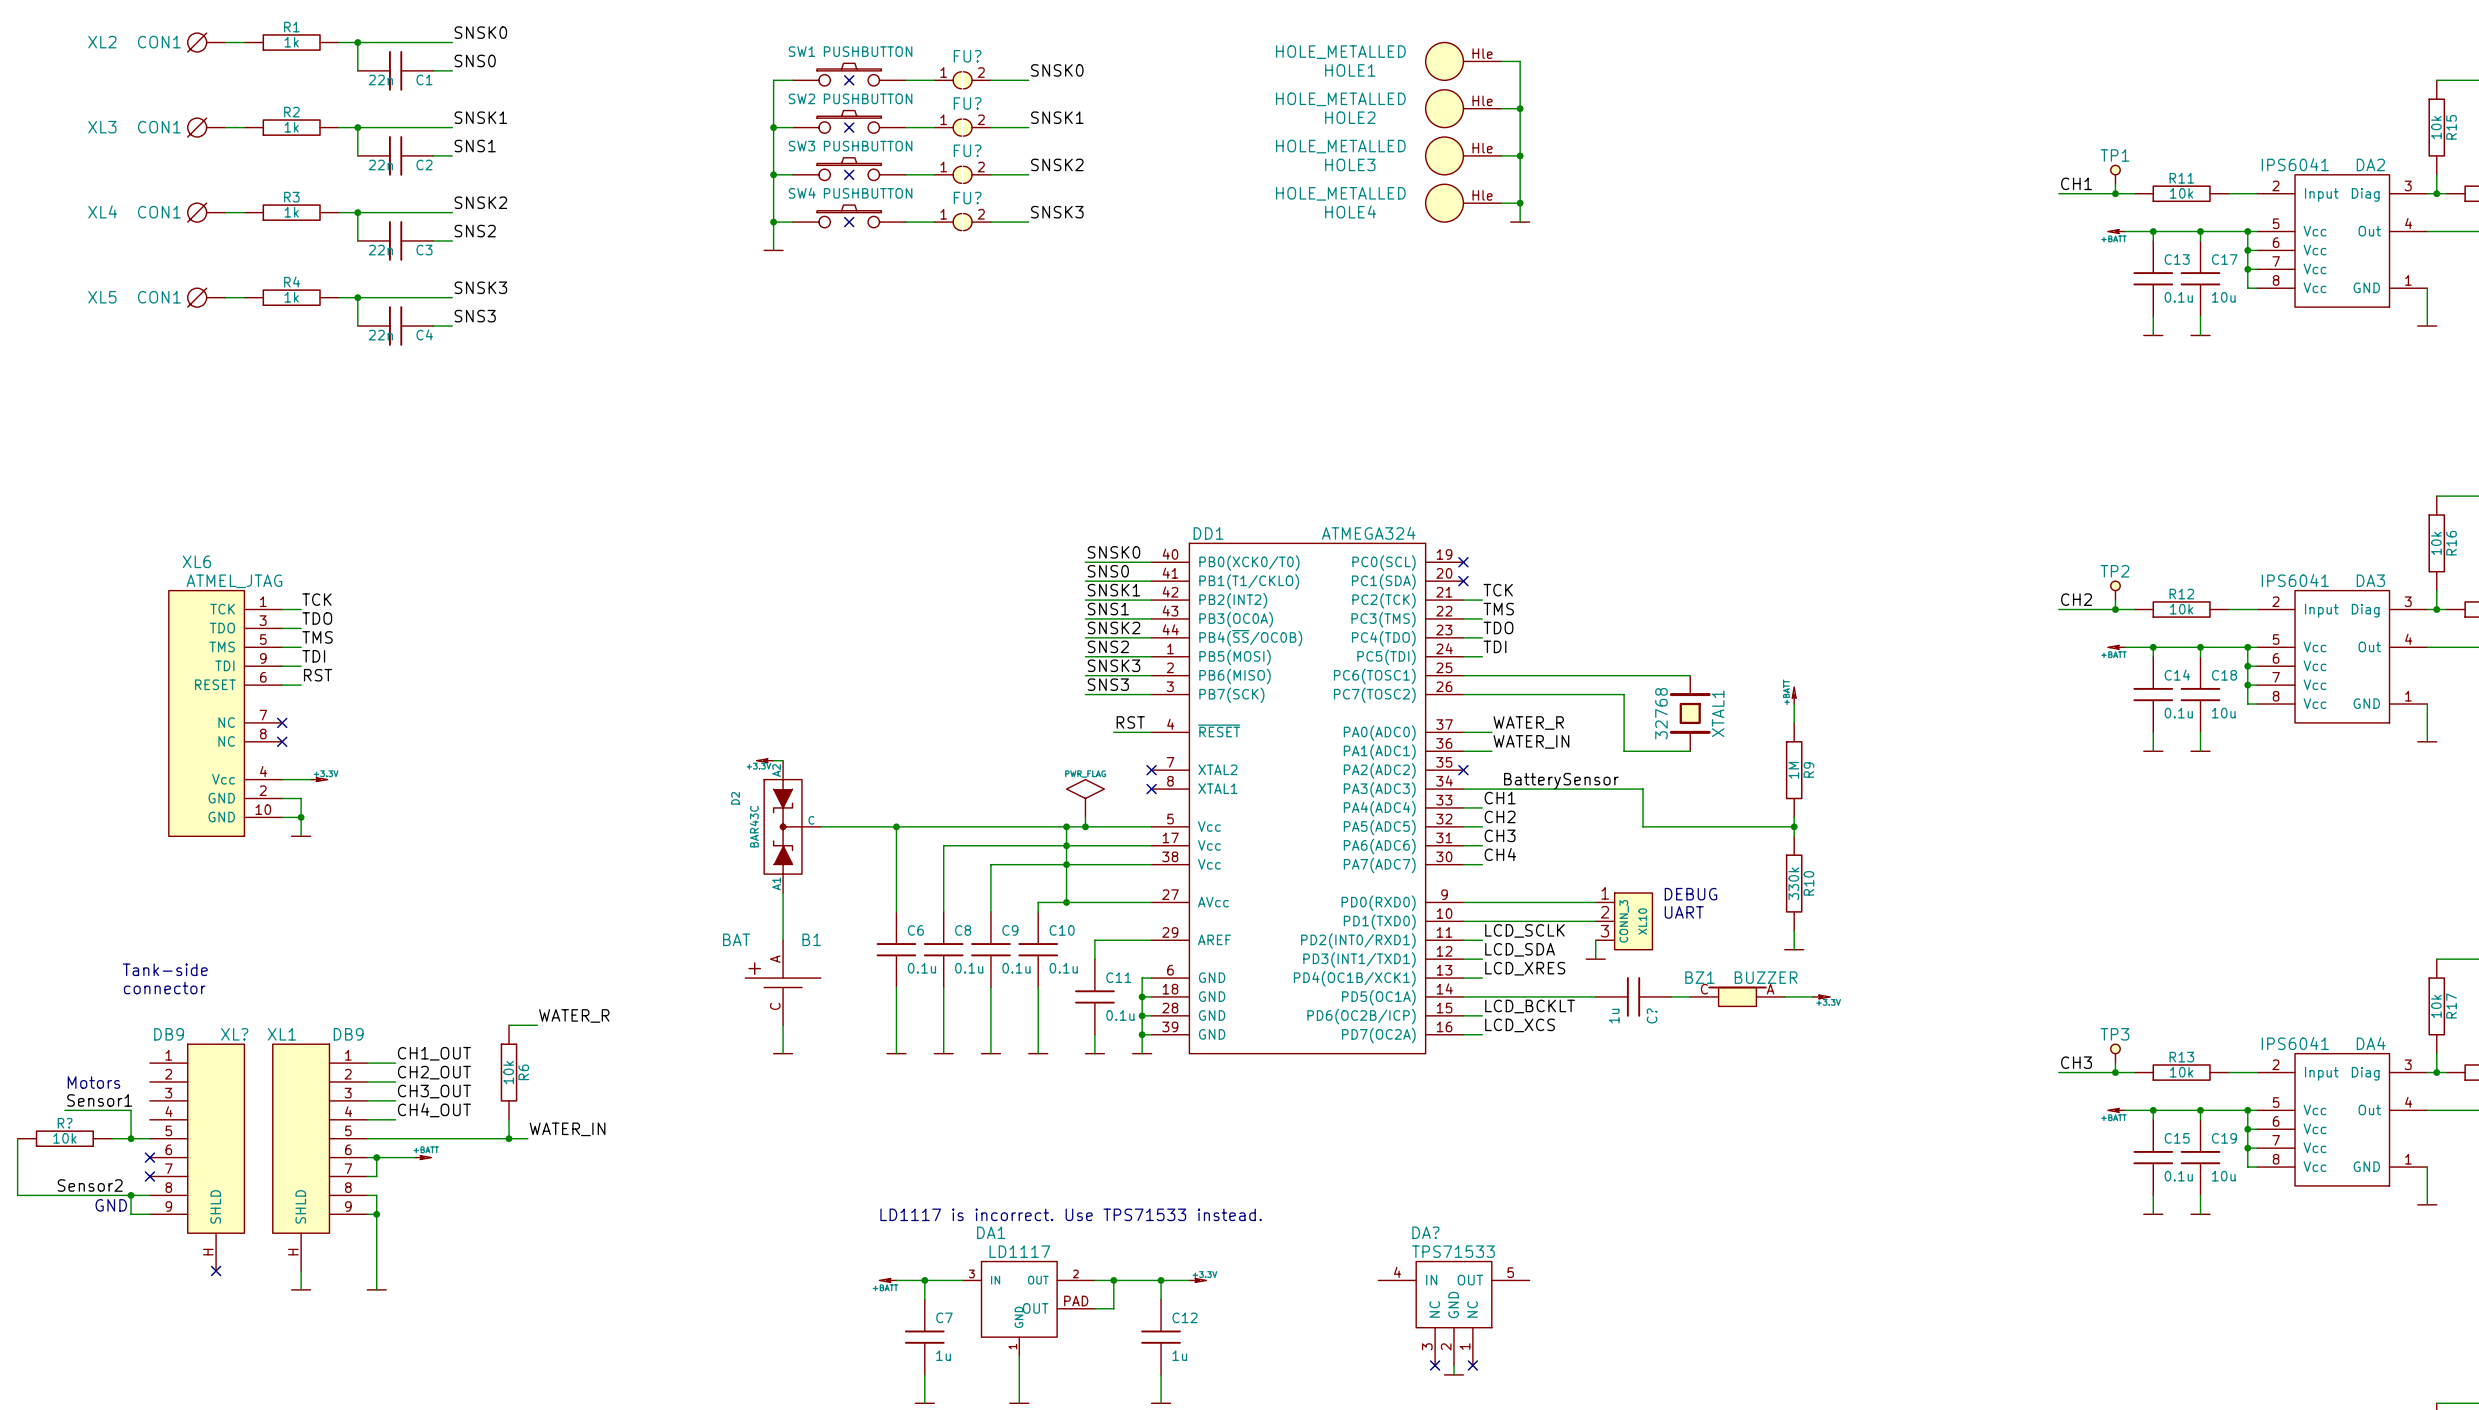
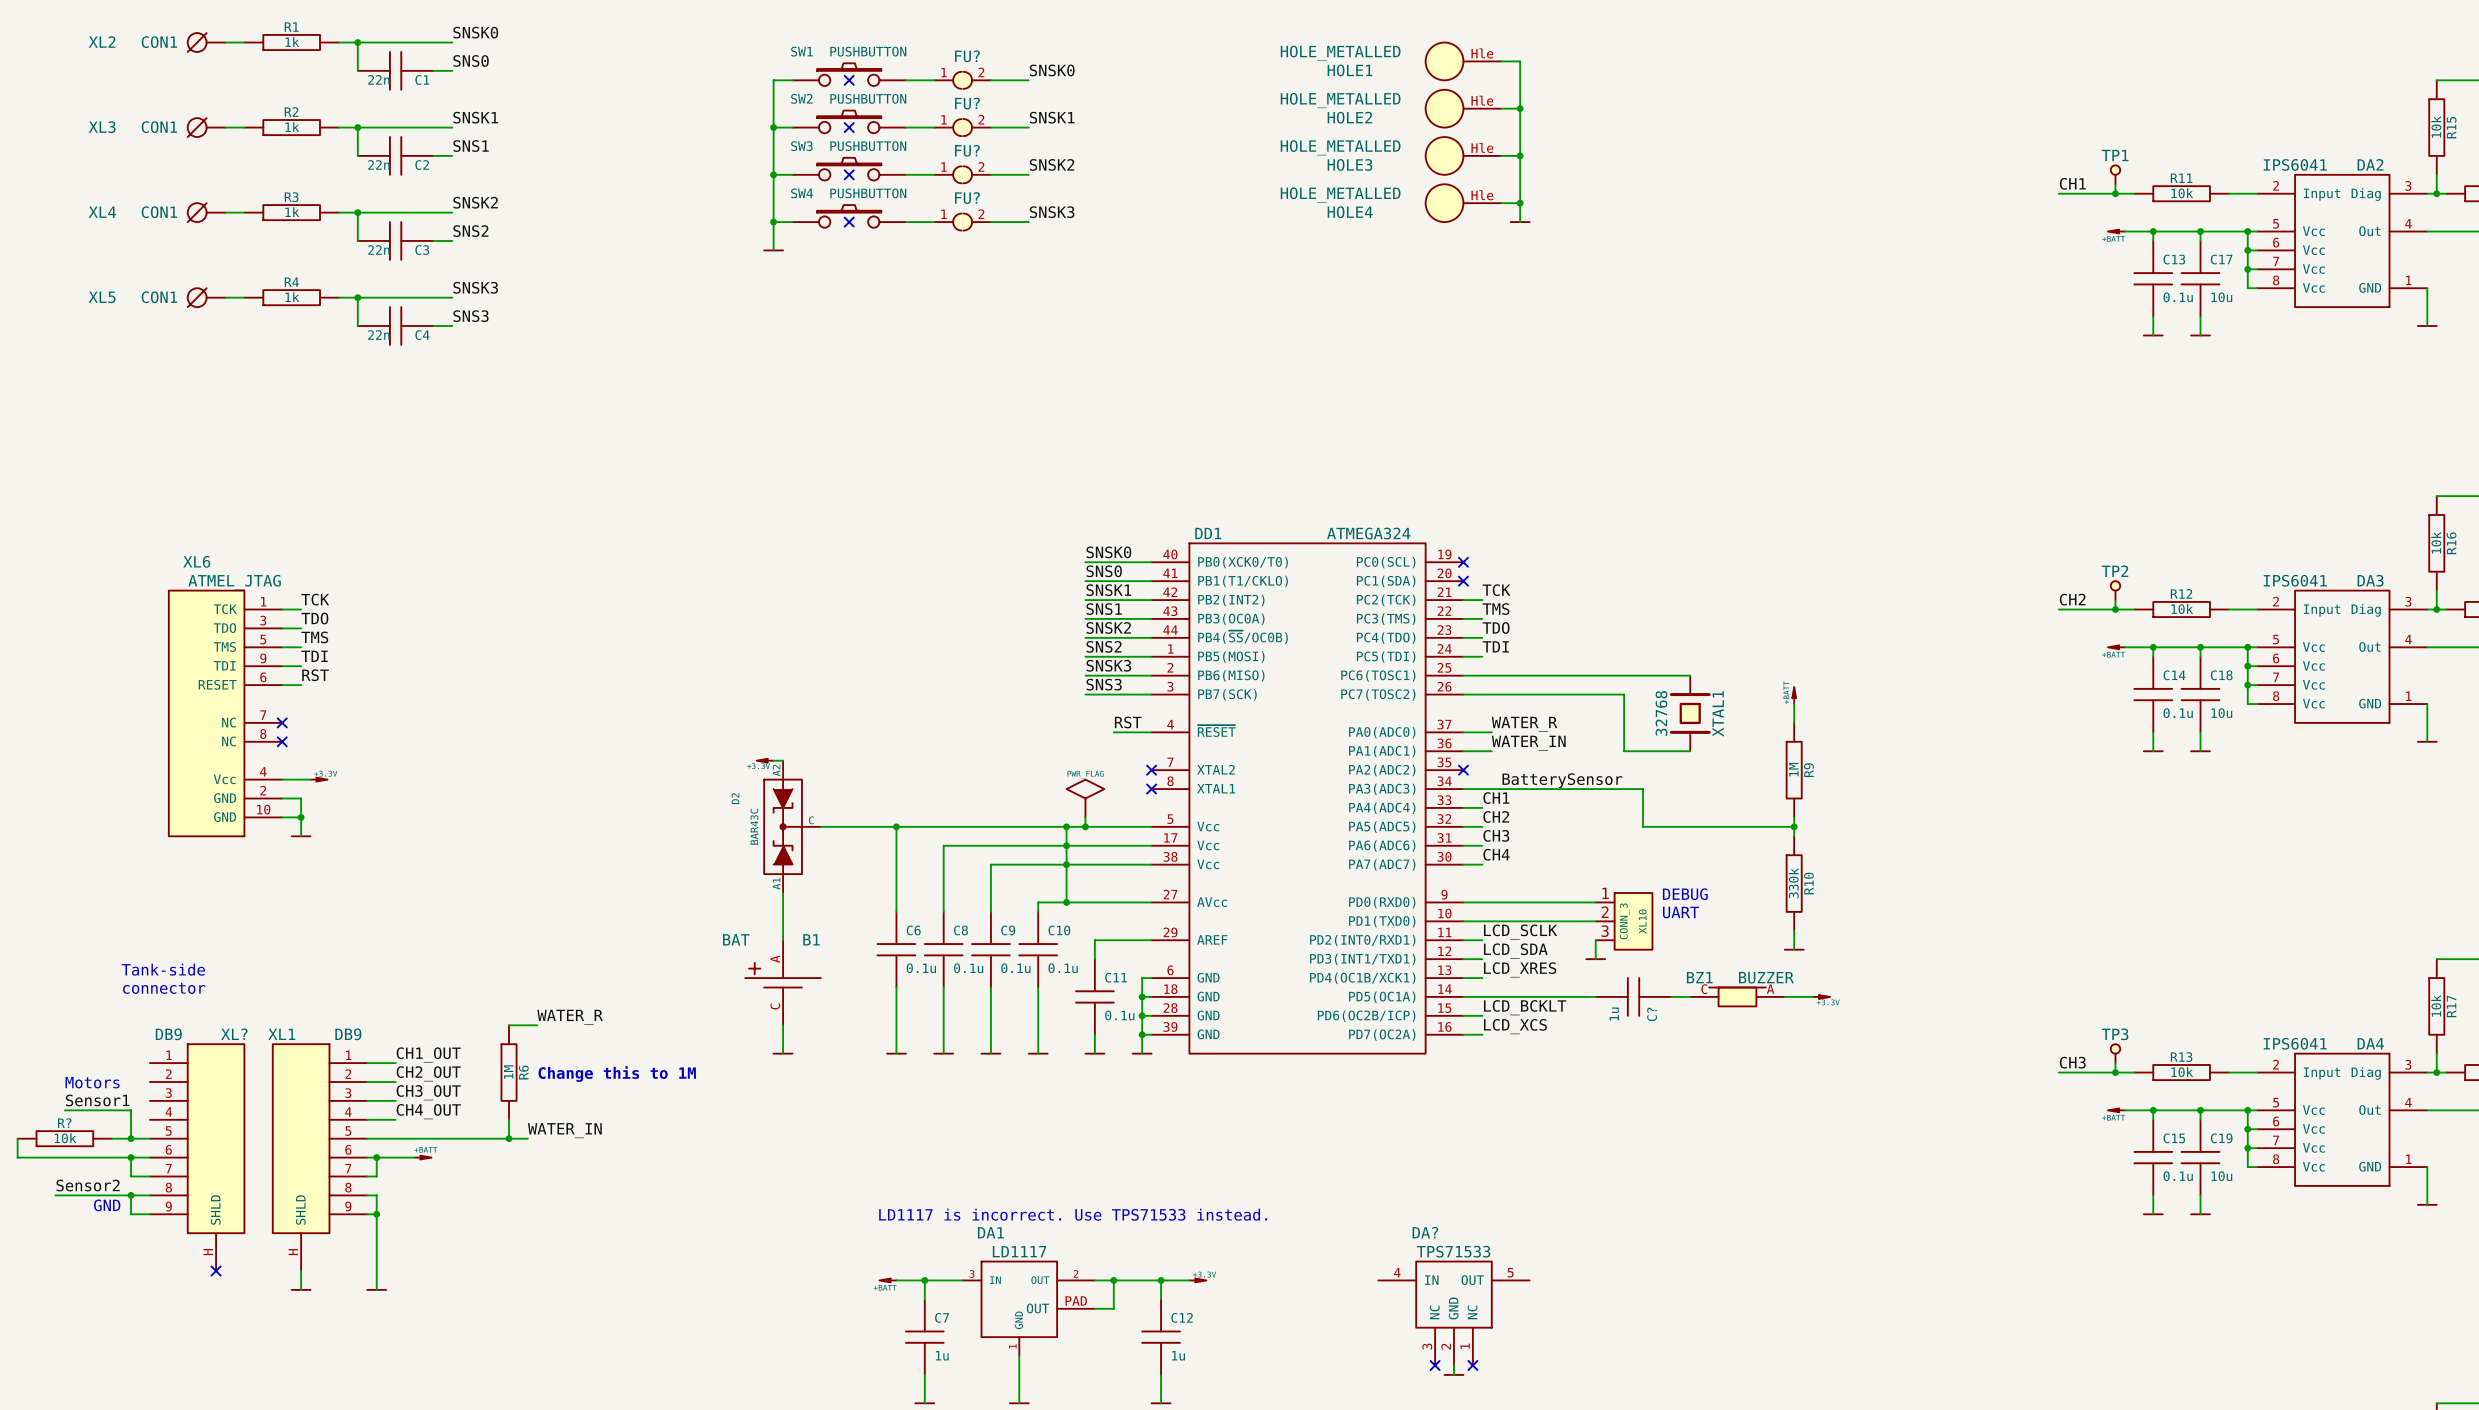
R6 value: 10k (508, 1072) -> 1M (508, 1072)
text: none -> Change this to 1M (617, 1074)
wire: (17, 1157) (17, 1195) (55, 1195) -> (17, 1157) (149, 1157)
wire: none -> (131, 1157) (131, 1176) (149, 1176)
junction: none -> (131, 1157)
no-connect mark: (149, 1157) -> none
no-connect mark: (149, 1176) -> none

